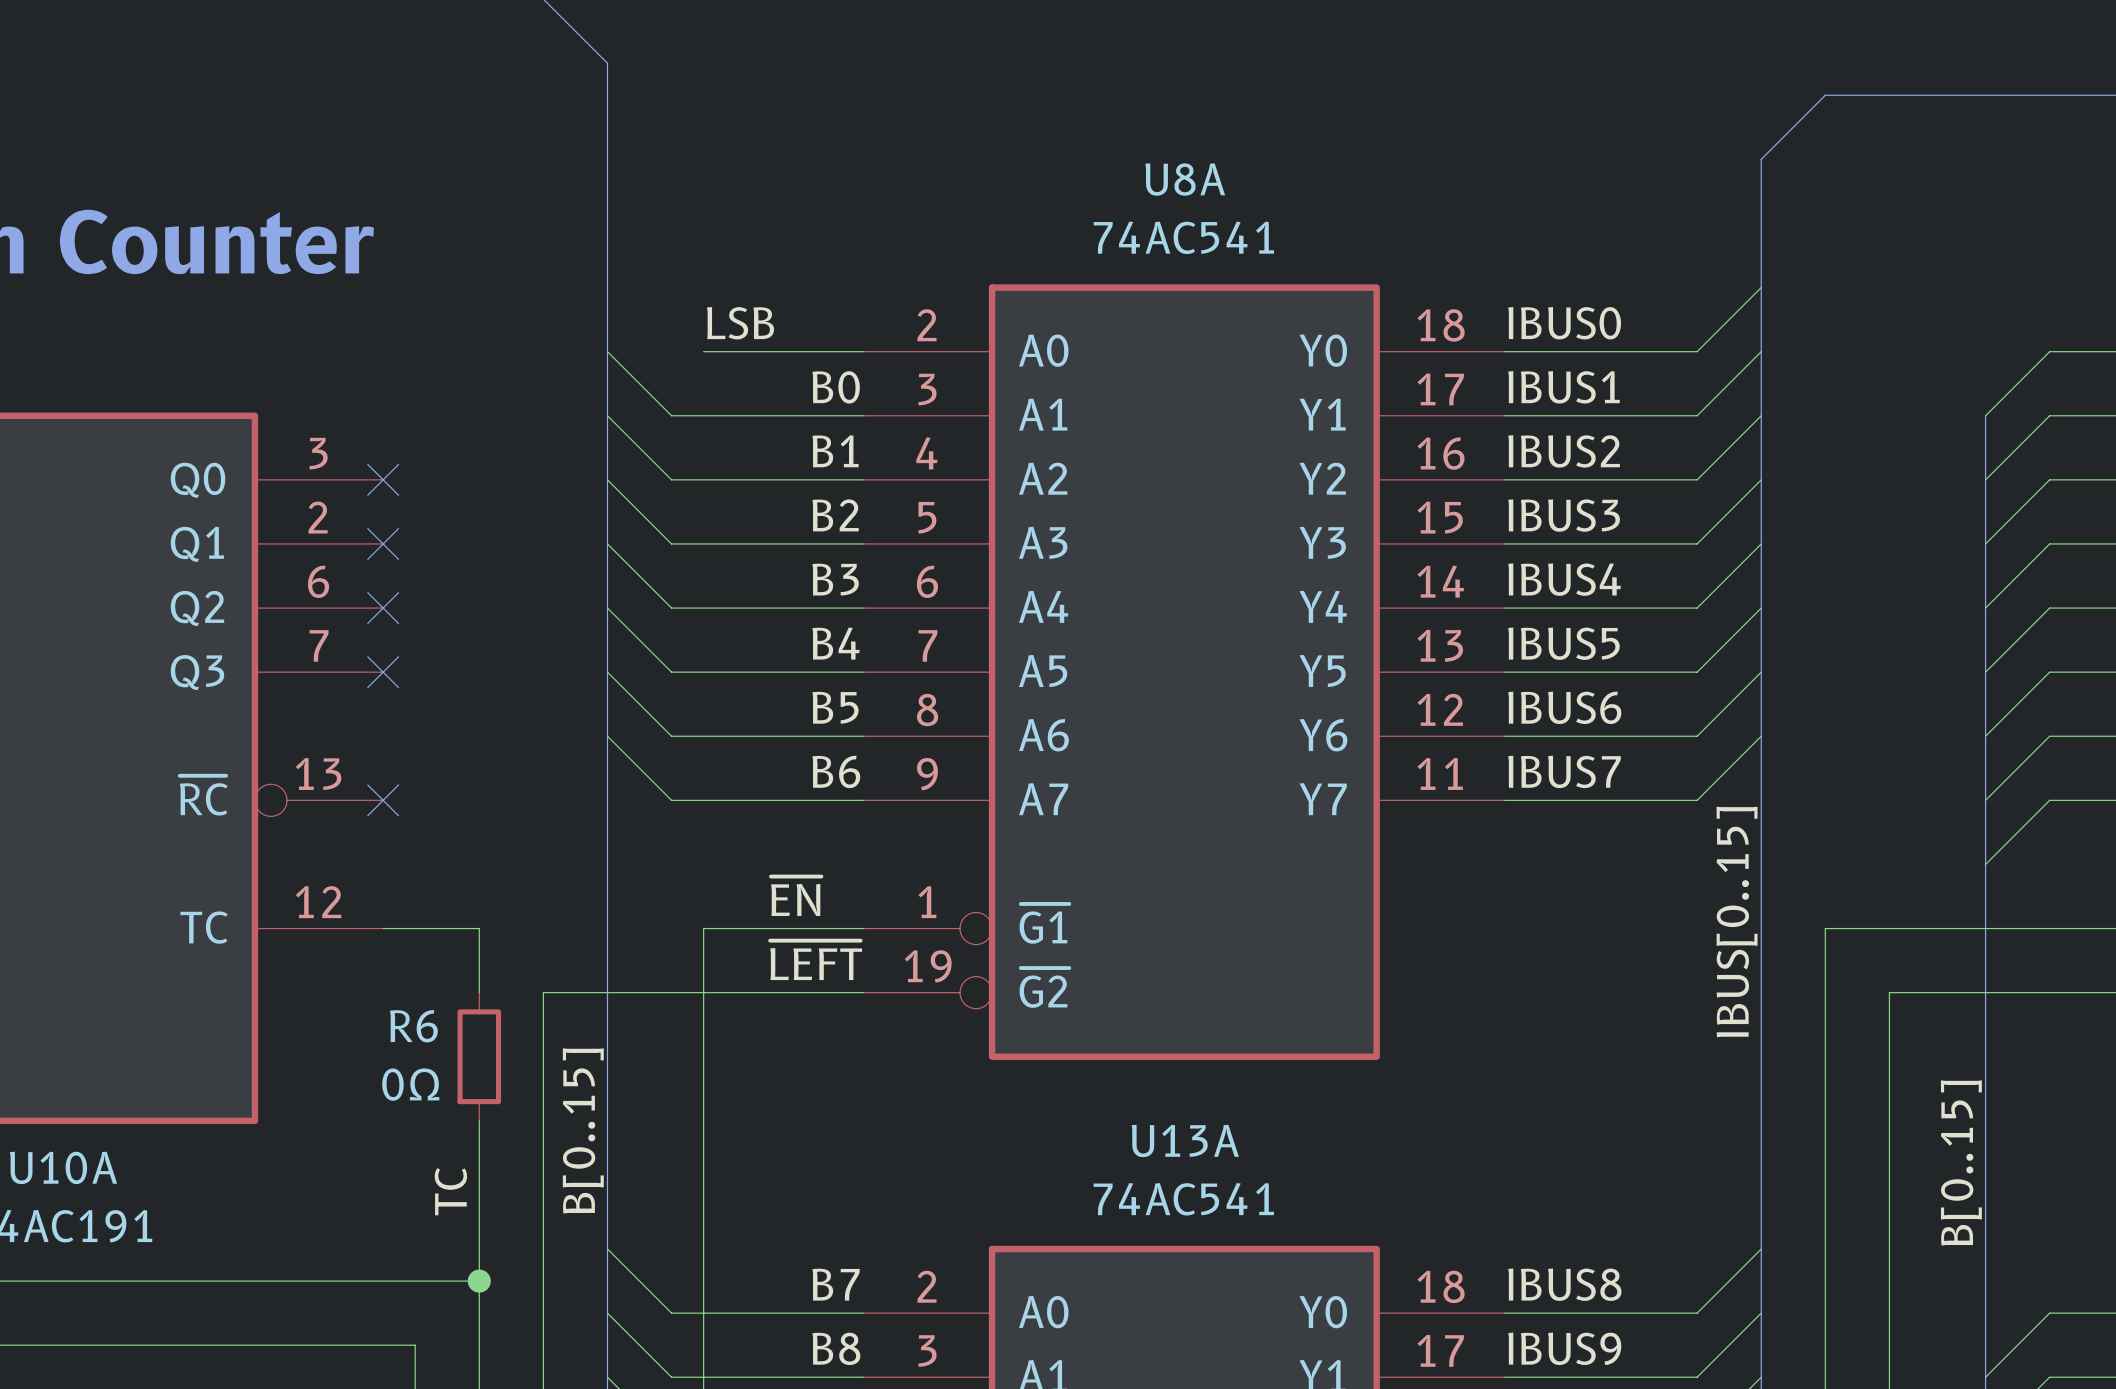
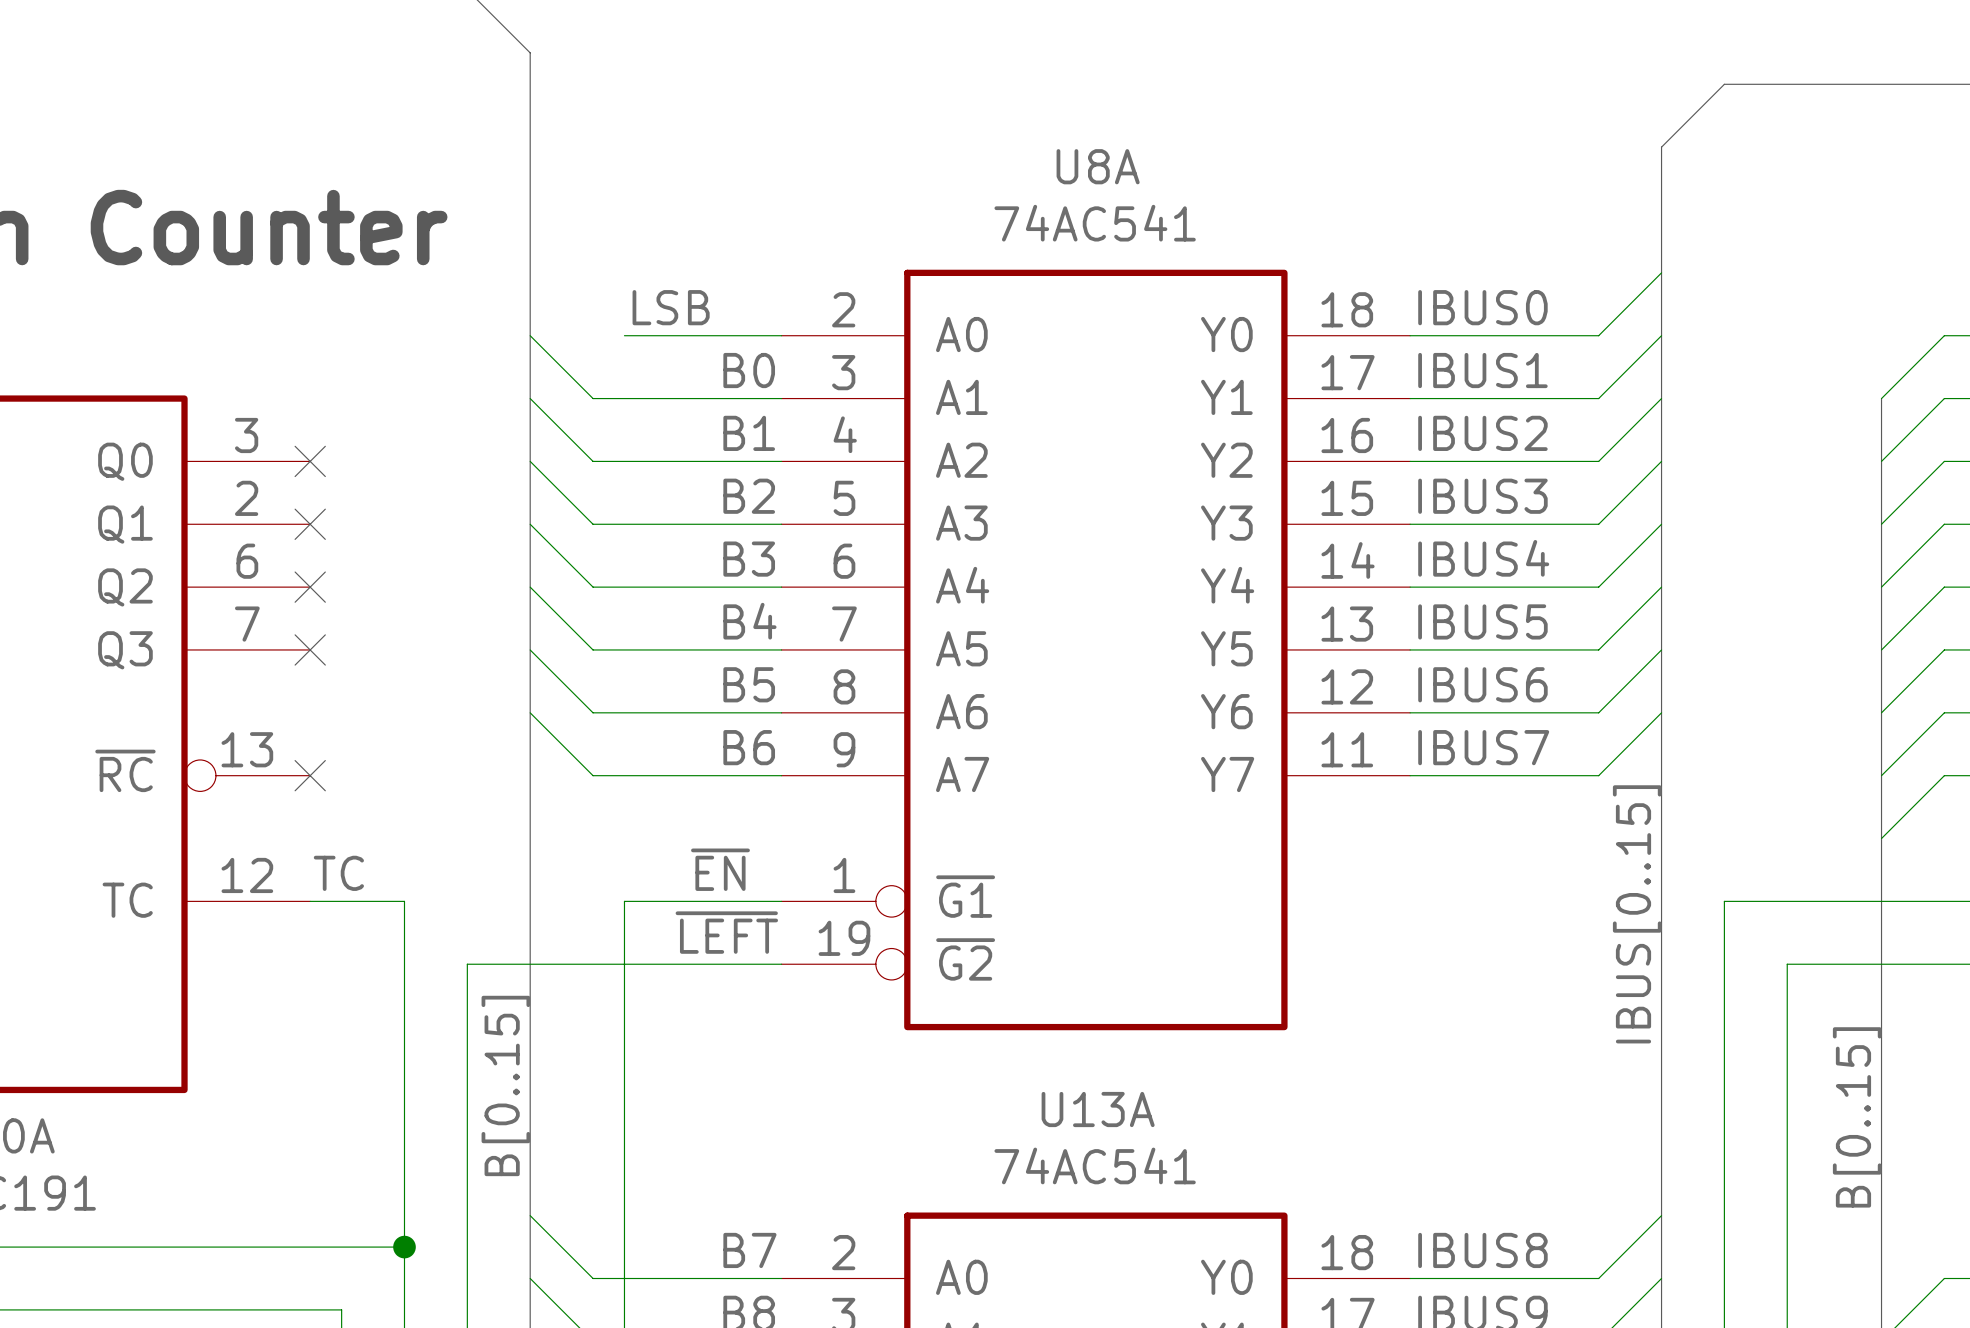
wire: none -> (404, 964) (404, 1089)
R6: 0Ω (479, 1056) -> none
label rotation: 0° (450, 1191) -> 90° clockwise (338, 873)
label position: TC (450, 1191) -> TC (338, 873)

